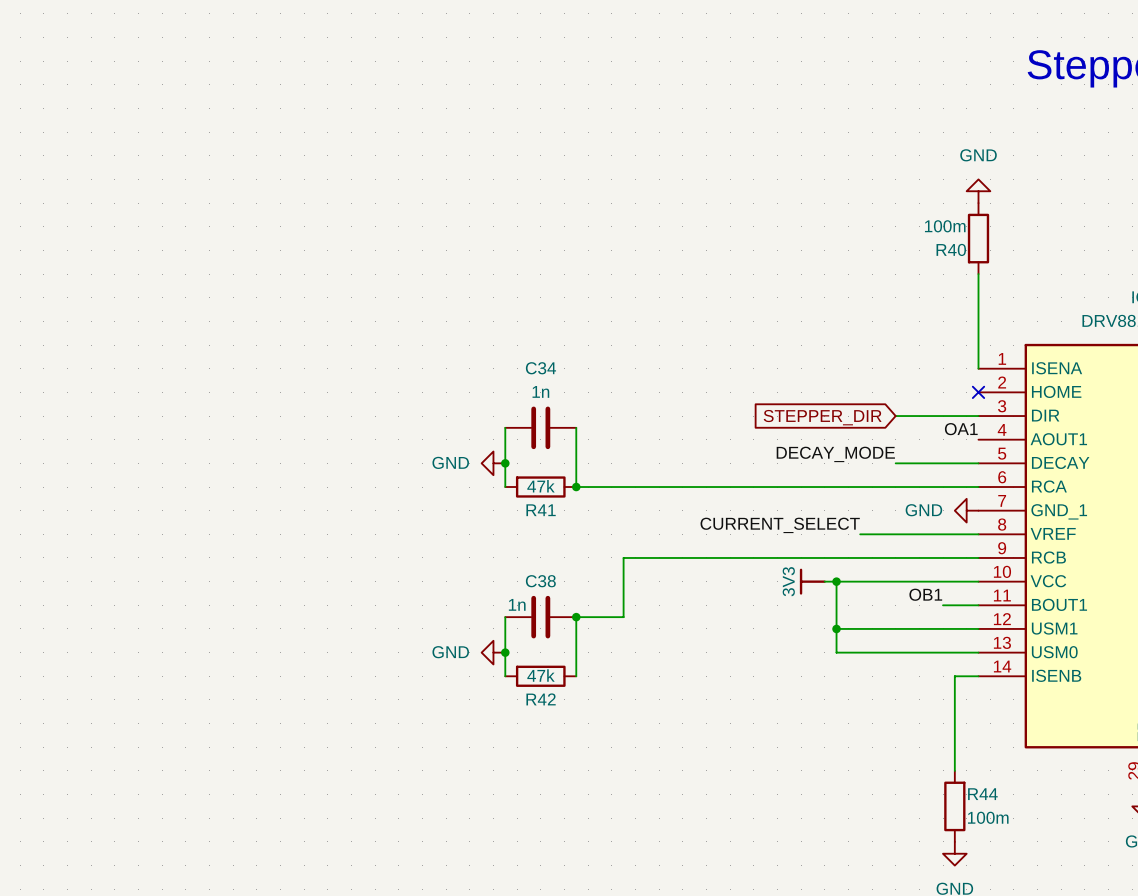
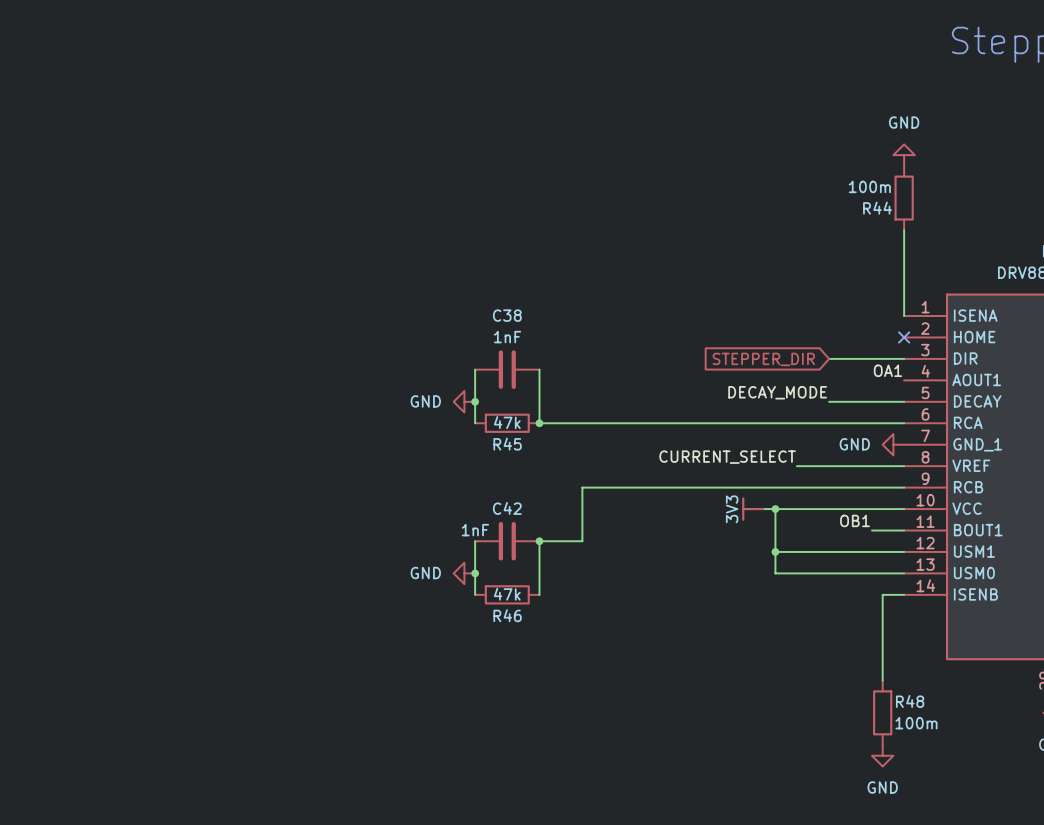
R40 name: R40 (951, 249) -> R44 (877, 208)
C34 name: C34 (540, 368) -> C38 (507, 315)
C34 value: 1n (540, 391) -> 1nF (507, 337)
R41 name: R41 (541, 510) -> R45 (507, 444)
C38 name: C38 (540, 581) -> C42 (507, 508)
C38 value: 1n (517, 604) -> 1nF (475, 530)
R42 name: R42 (541, 699) -> R46 (507, 615)
R44 name: R44 (982, 794) -> R48 (910, 701)

